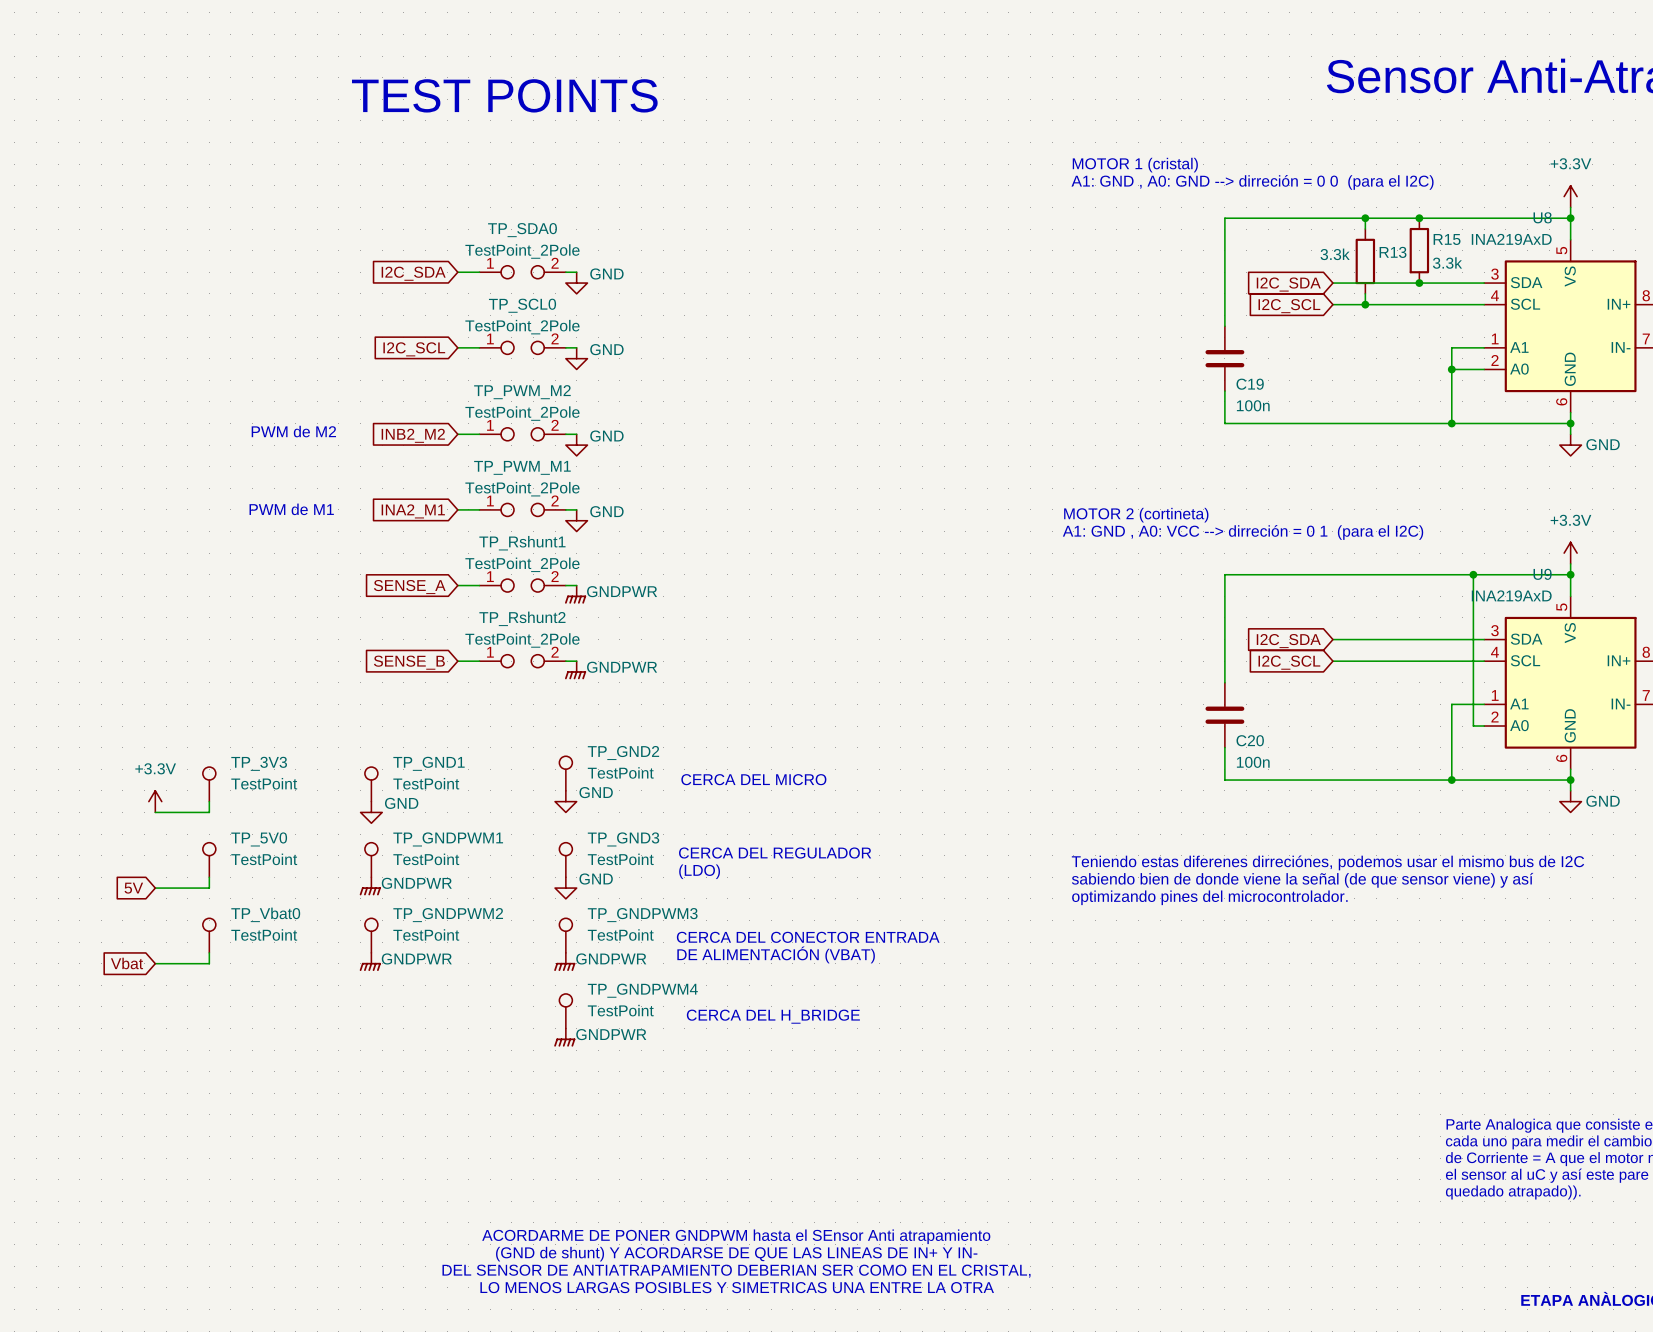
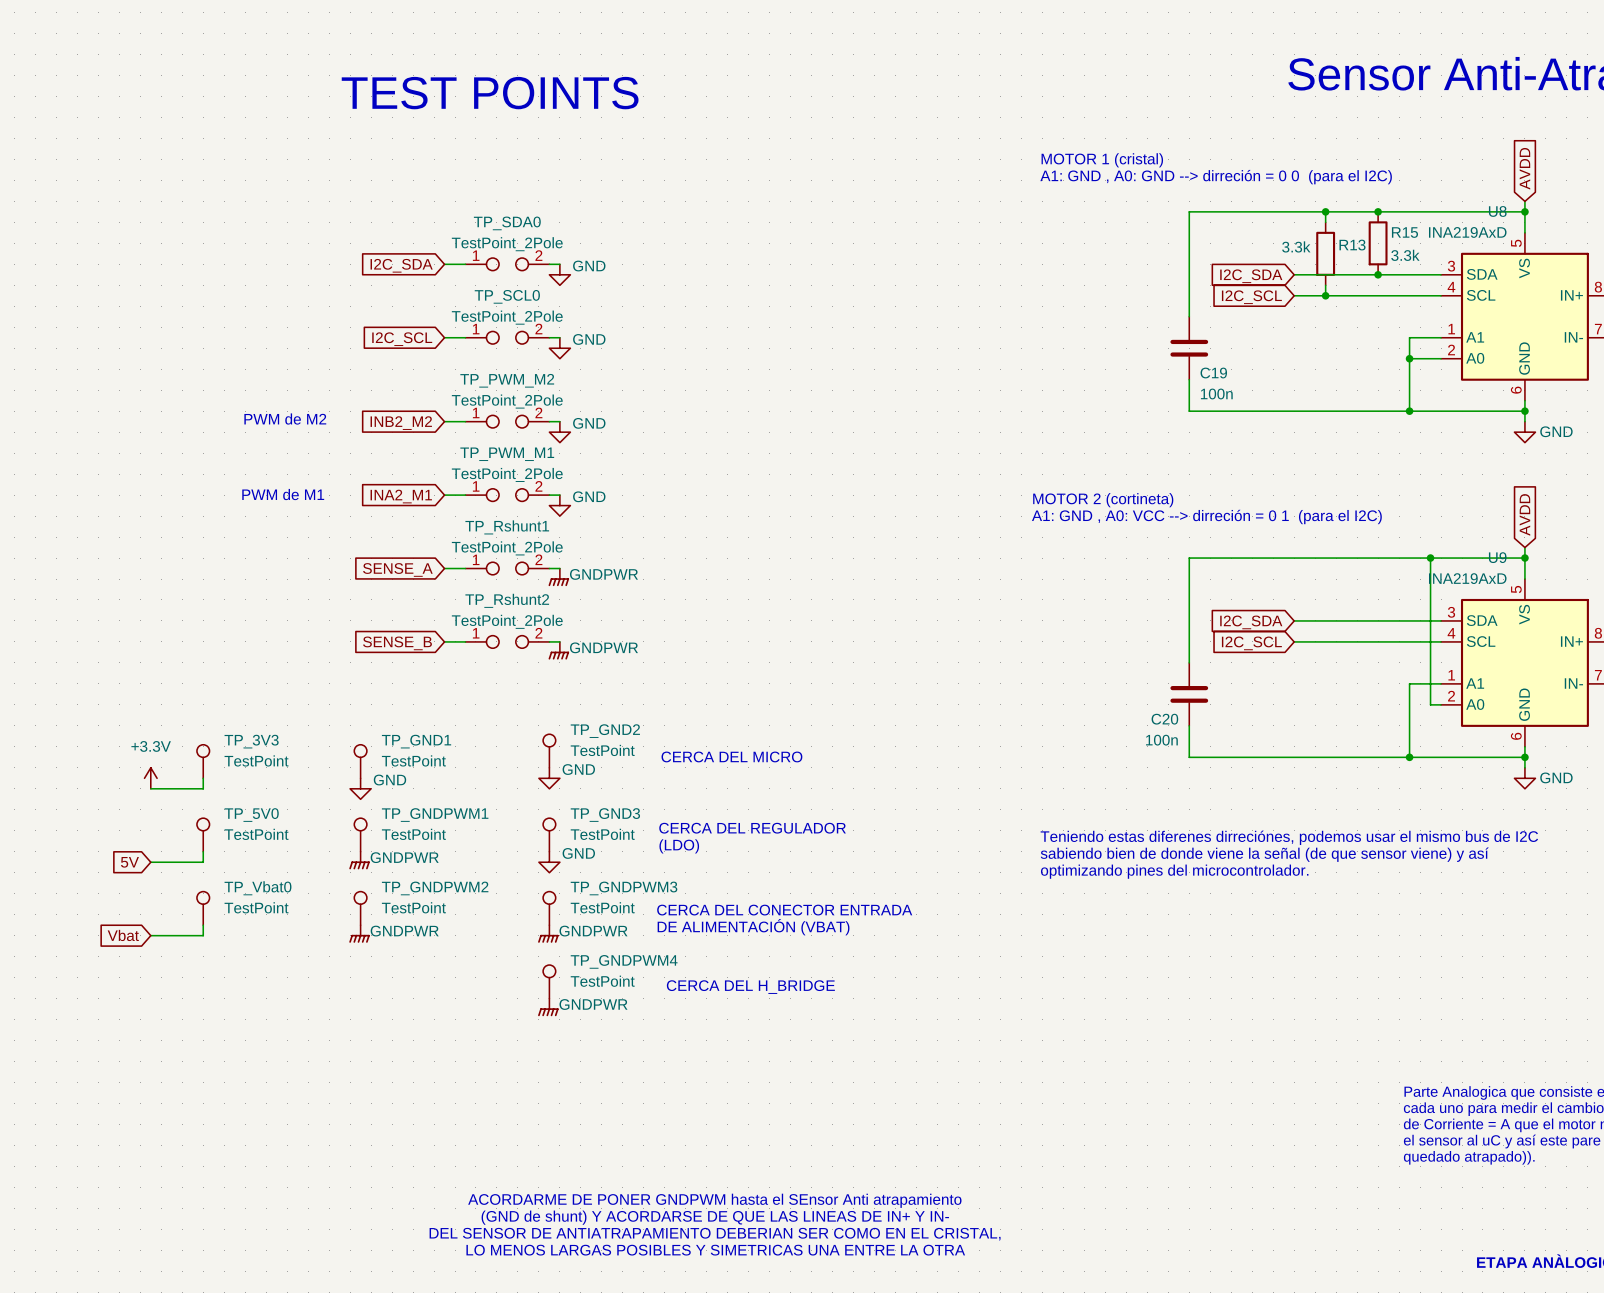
global label: none -> AVDD (1524, 168)
power symbol: +3.3V (1570, 196) -> none
global label: none -> AVDD (1524, 514)
power symbol: +3.3V (1570, 553) -> none
C20 name position: C20 (1250, 740) -> C20 (1164, 719)
C20 value position: 100n (1253, 762) -> 100n (1161, 740)

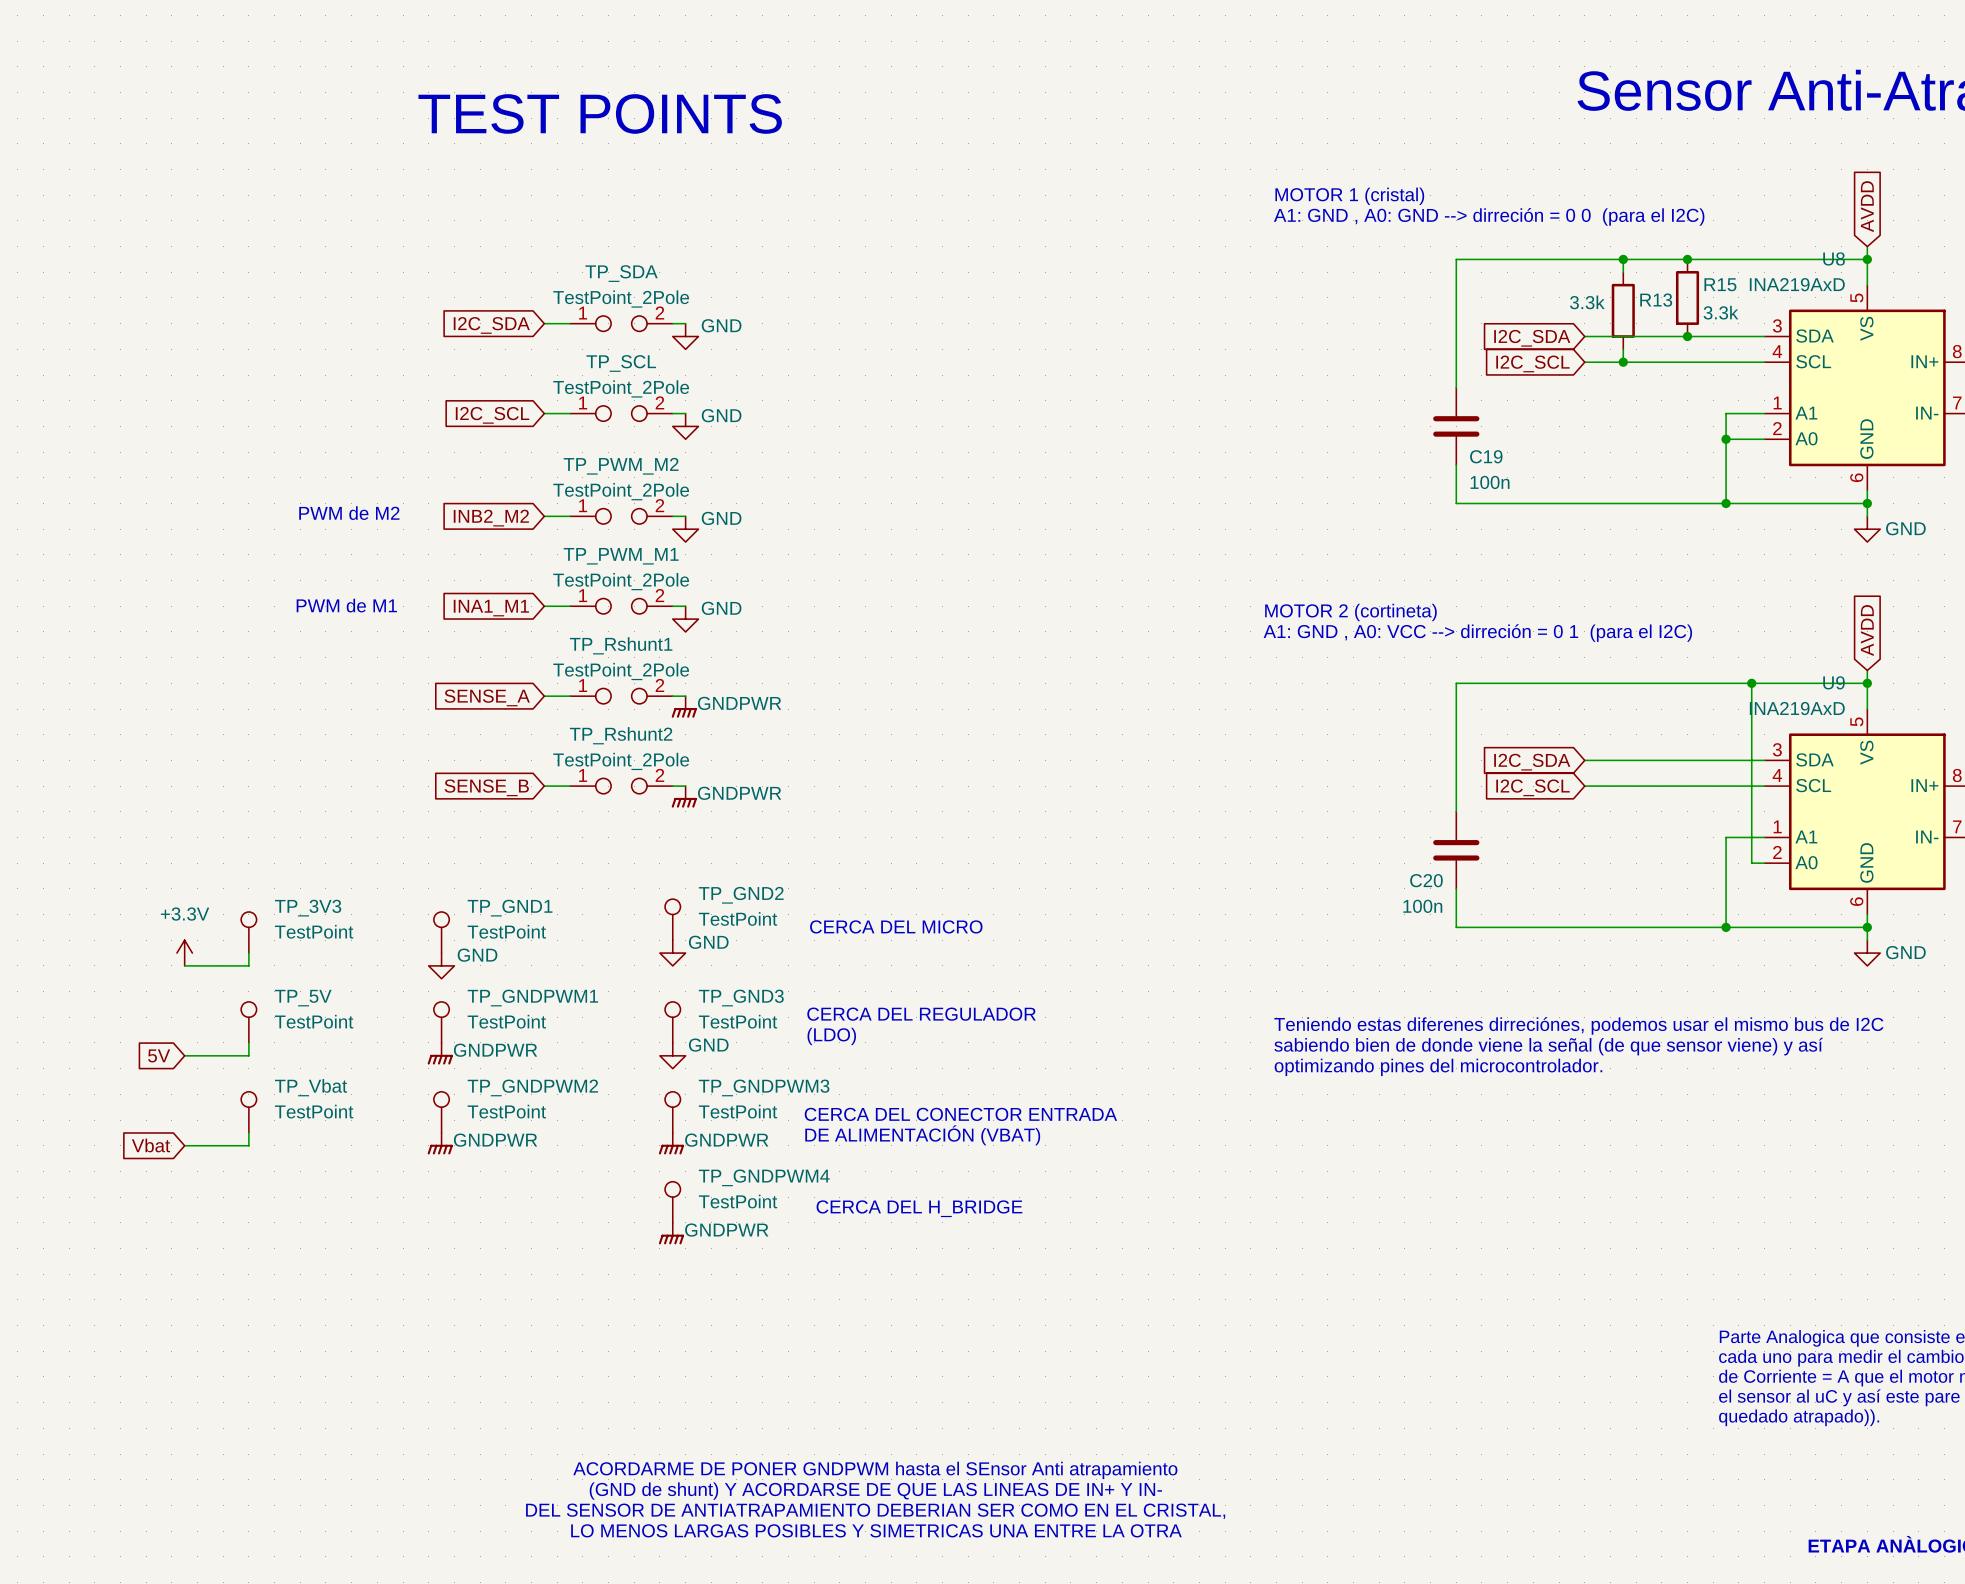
TP_SDA0 name: TP_SDA0 (507, 223) -> TP_SDA (621, 273)
TP_SCL0 name: TP_SCL0 (507, 296) -> TP_SCL (621, 363)
global label: INA2_M1 (401, 496) -> INA1_M1 (491, 608)
TP_5V0 name: TP_5V0 (251, 815) -> TP_5V (303, 998)
TP_Vbat0 name: TP_Vbat0 (258, 888) -> TP_Vbat (311, 1087)

